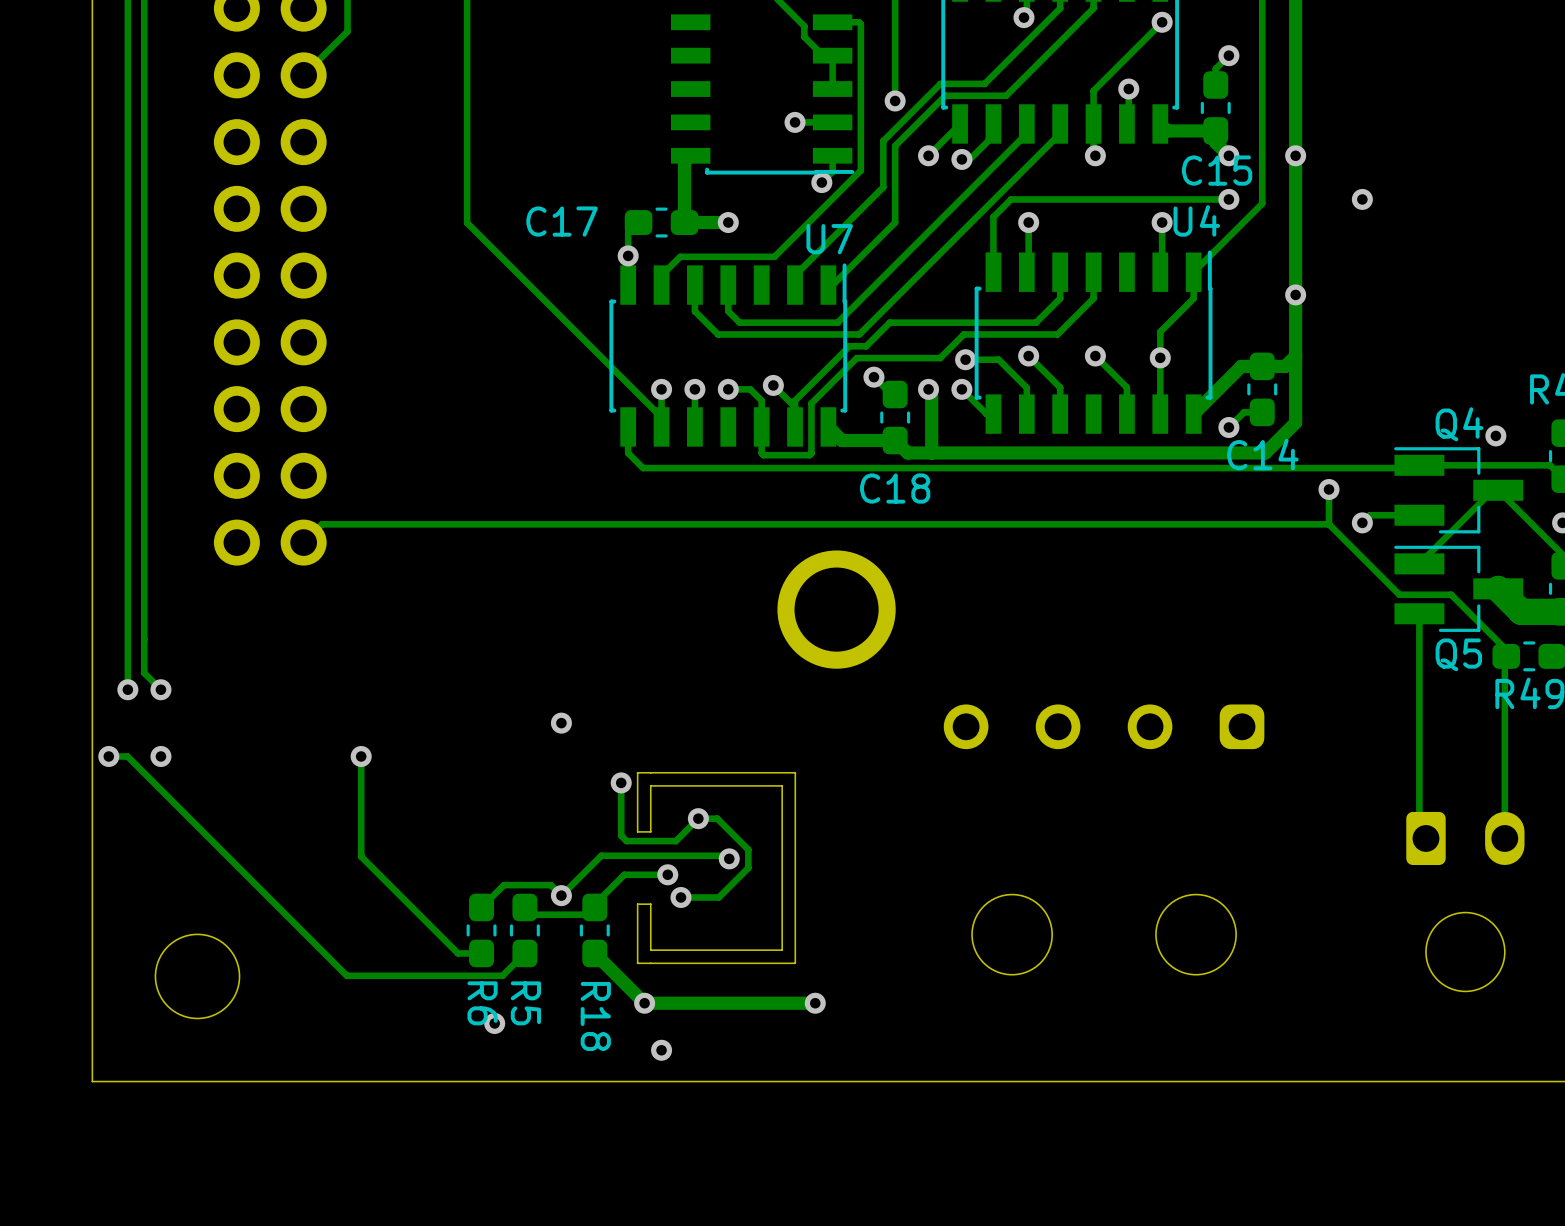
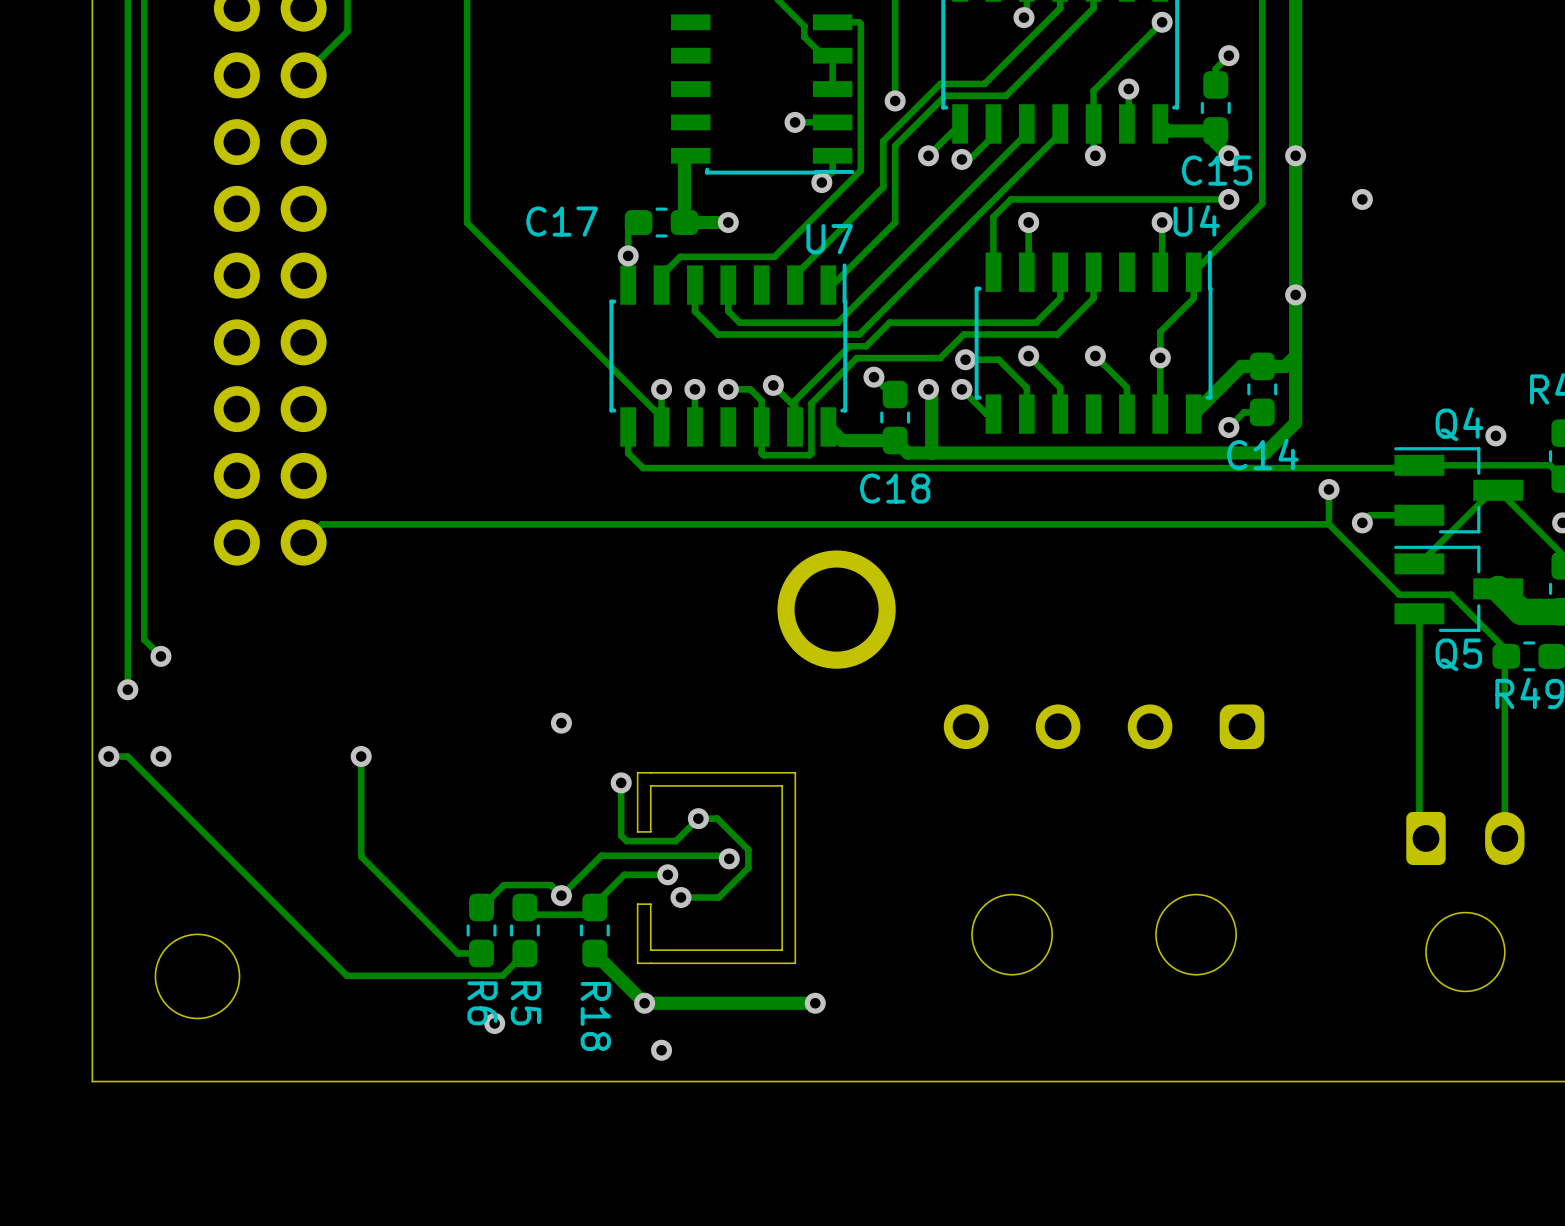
track: (144, 639) (144, 673) (160, 689) -> (144, 639) (160, 656)
via position: (160, 689) -> (160, 656)

